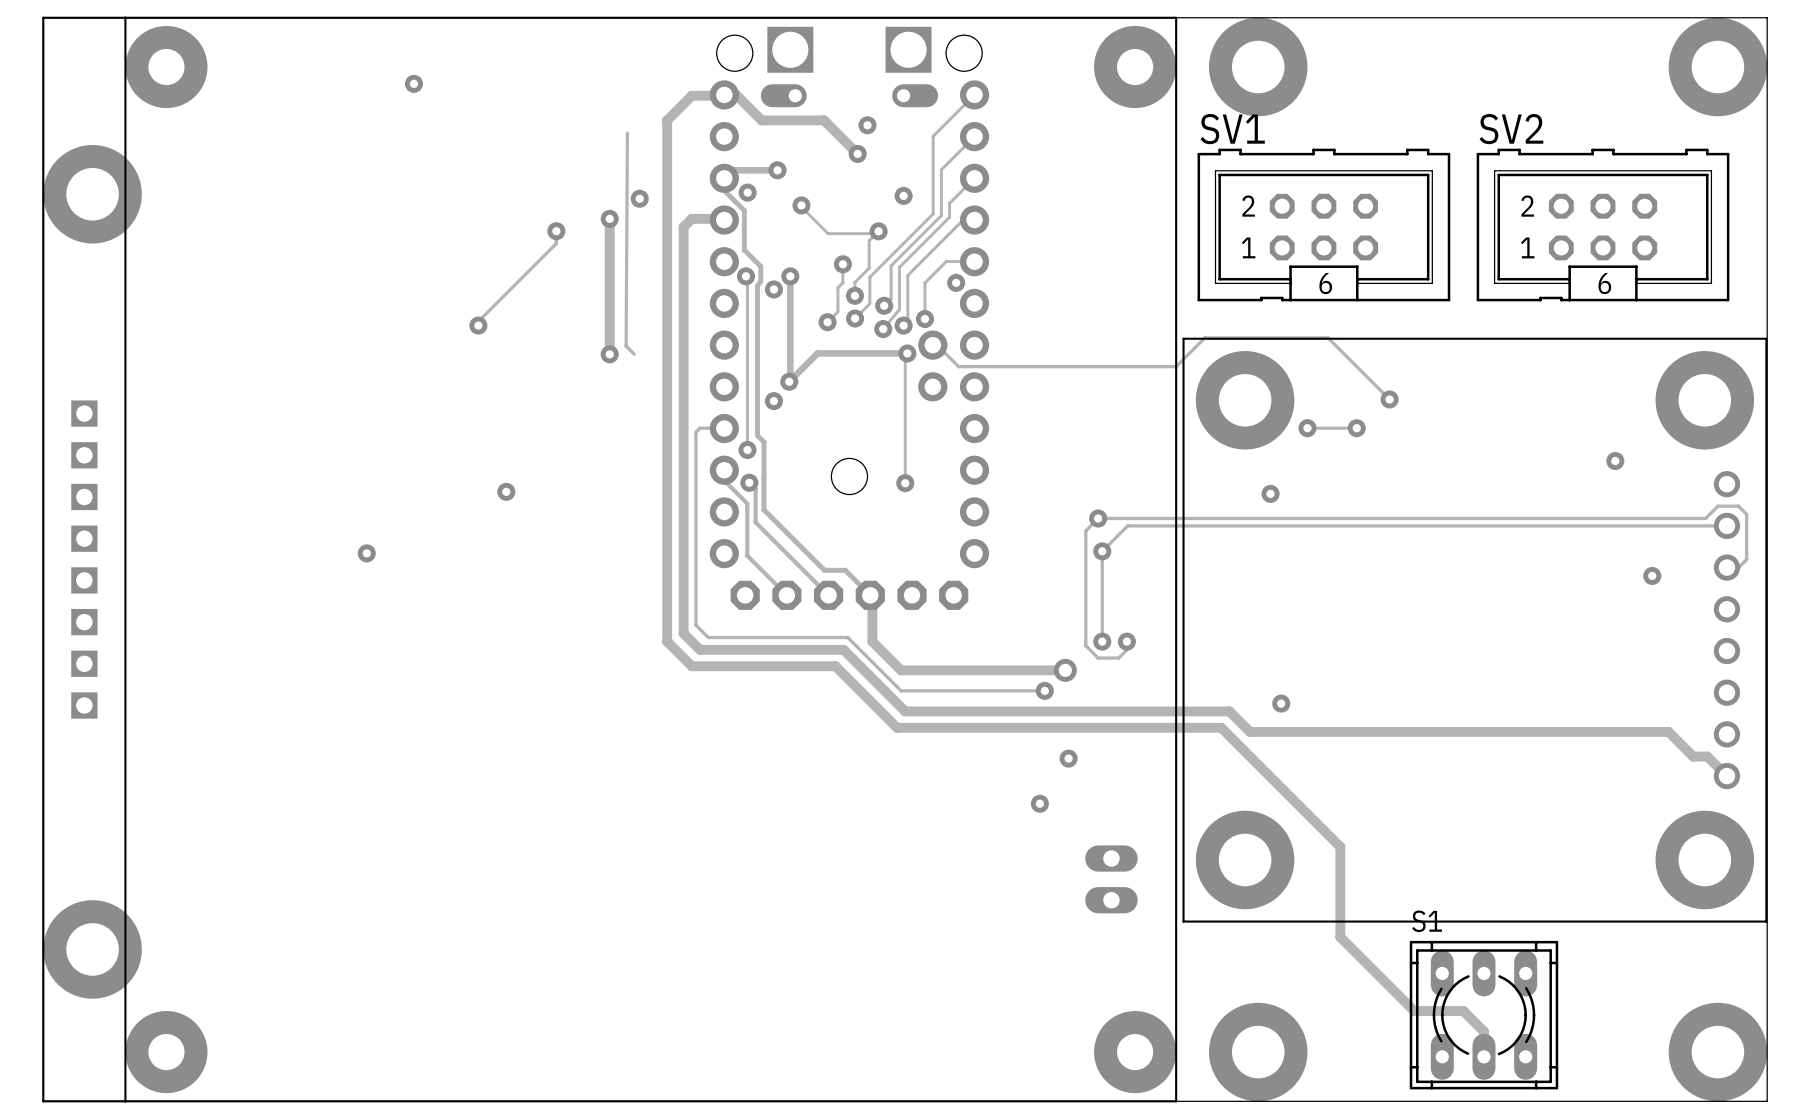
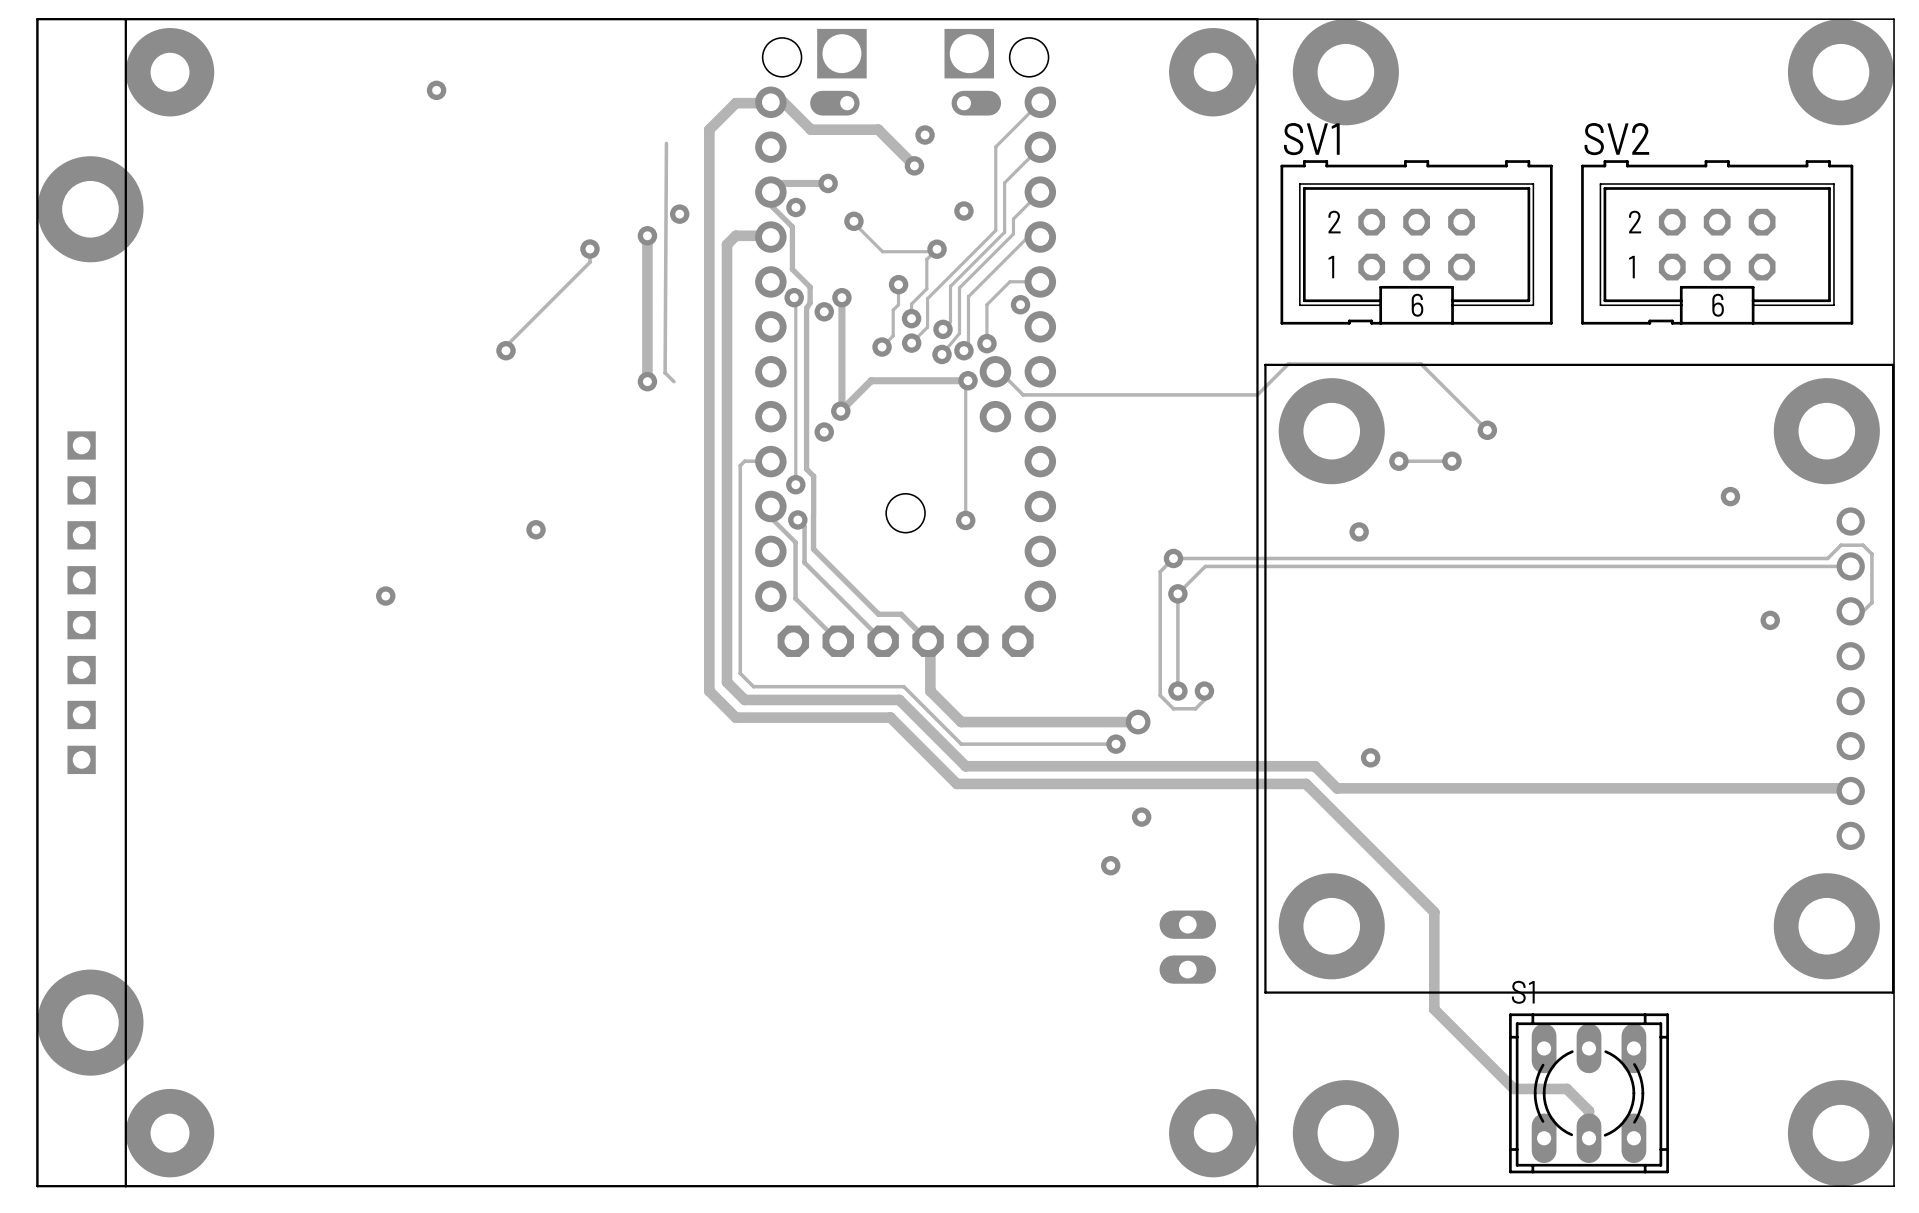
track: (1668, 731) (1693, 756) (1707, 756) (1726, 776) -> (1787, 788) (1840, 788) (1843, 791) (1850, 791)

